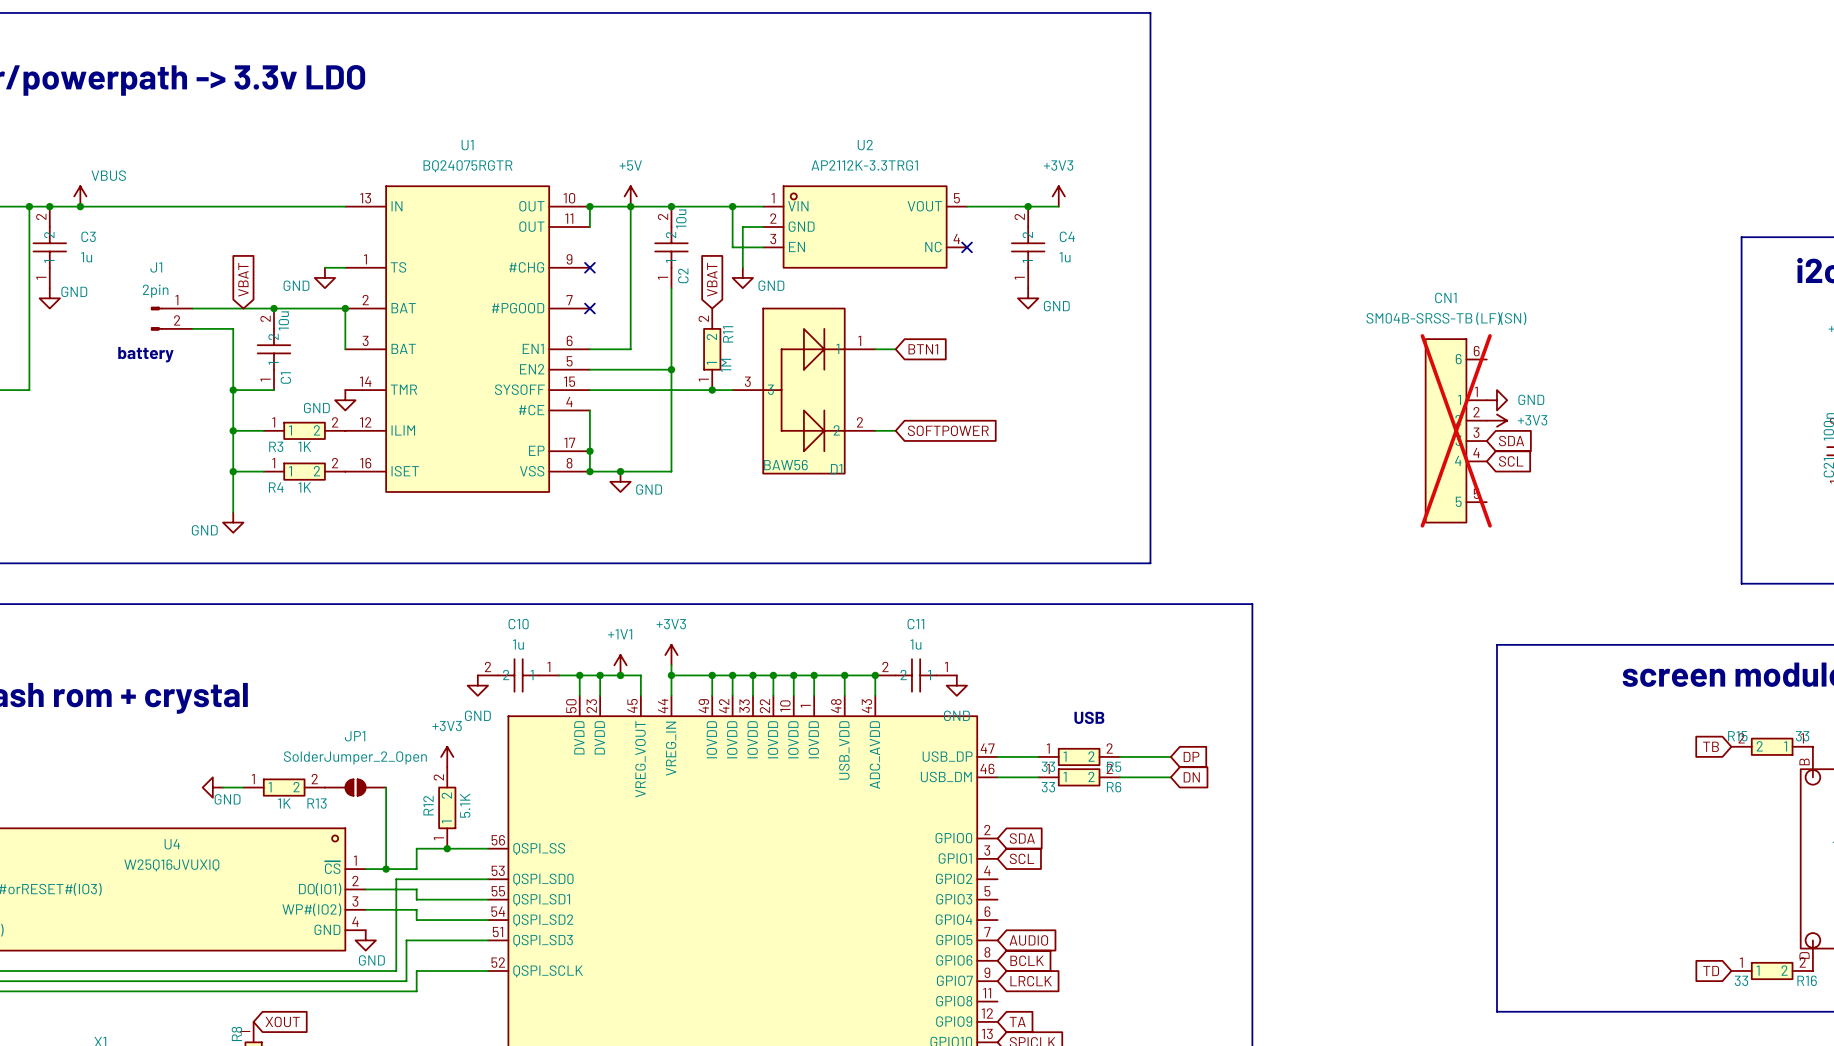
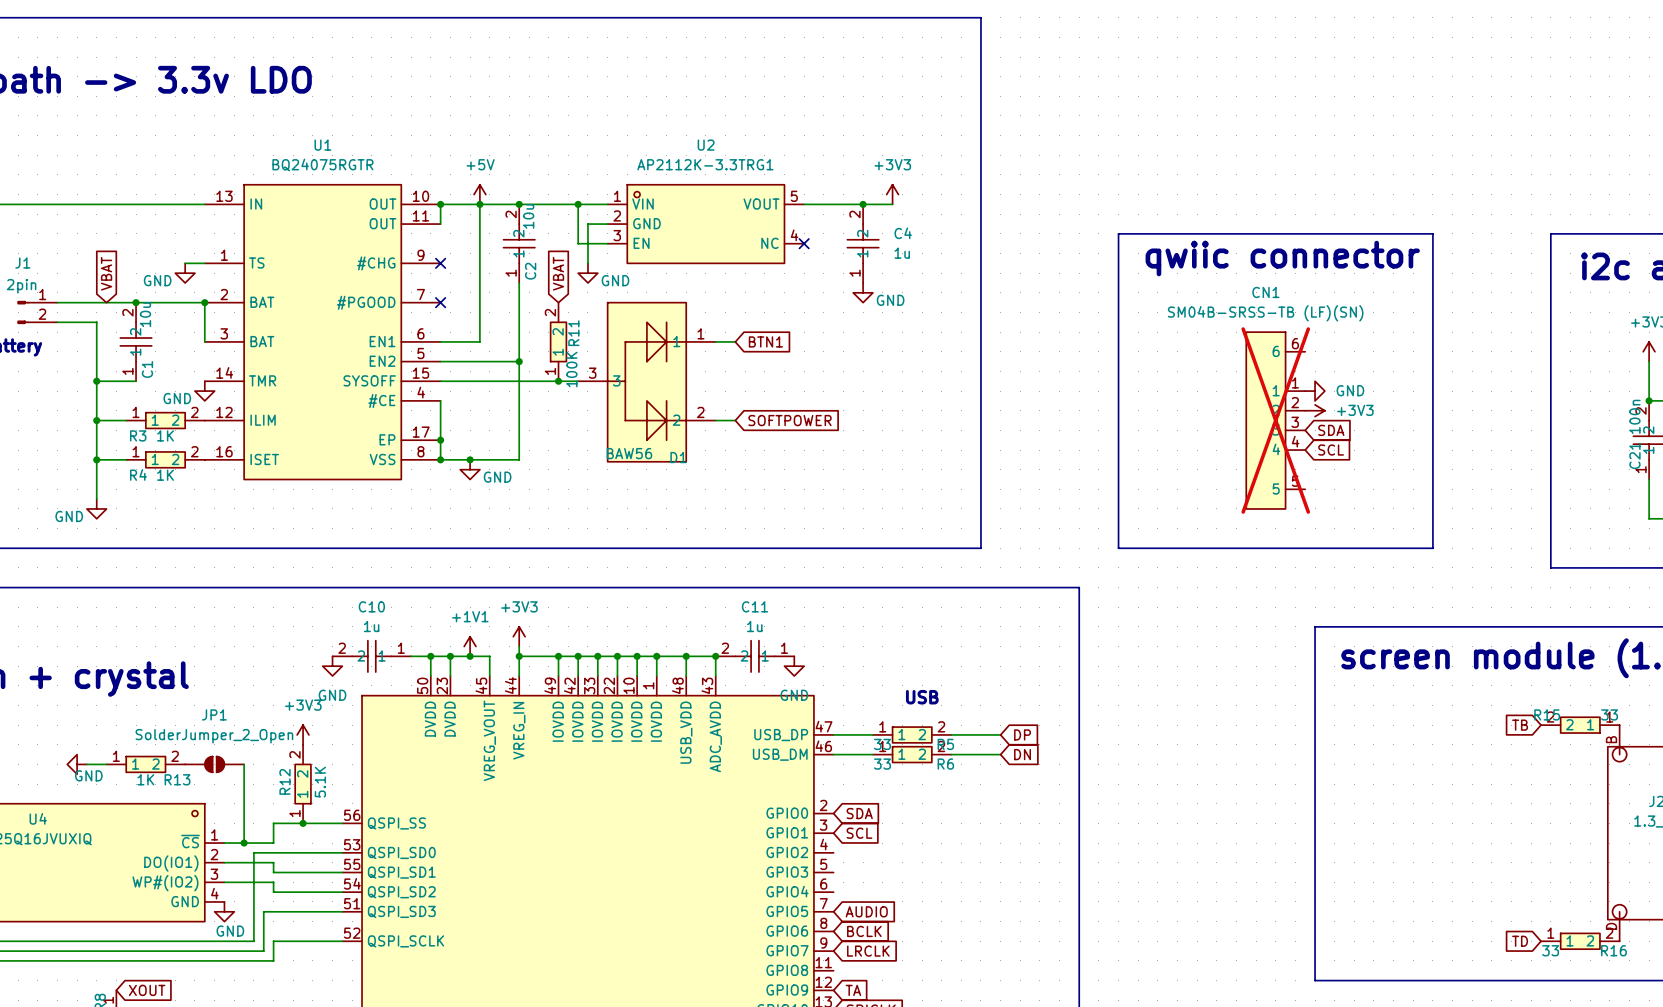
line: none -> (1118, 233) (1432, 233) (1432, 548) (1118, 548) (1118, 233)
text: none -> qwiic connector (1282, 258)
R11 value: 1M (726, 365) -> 100K (571, 369)

